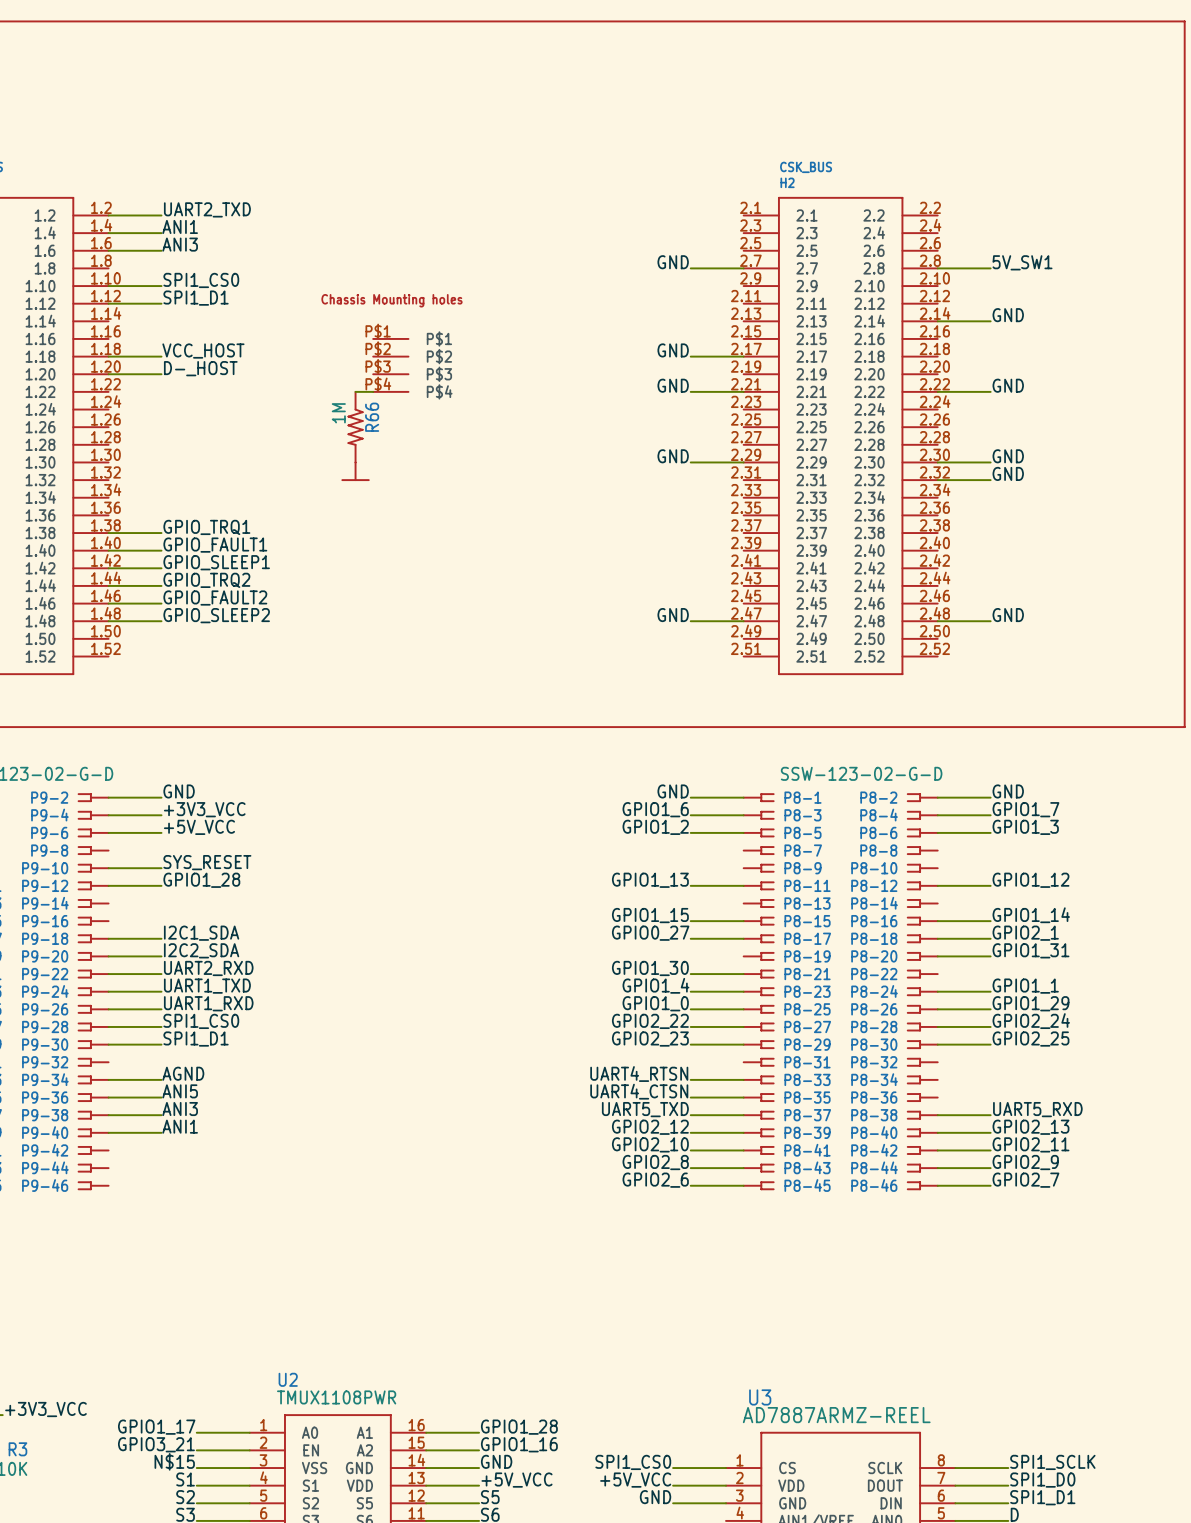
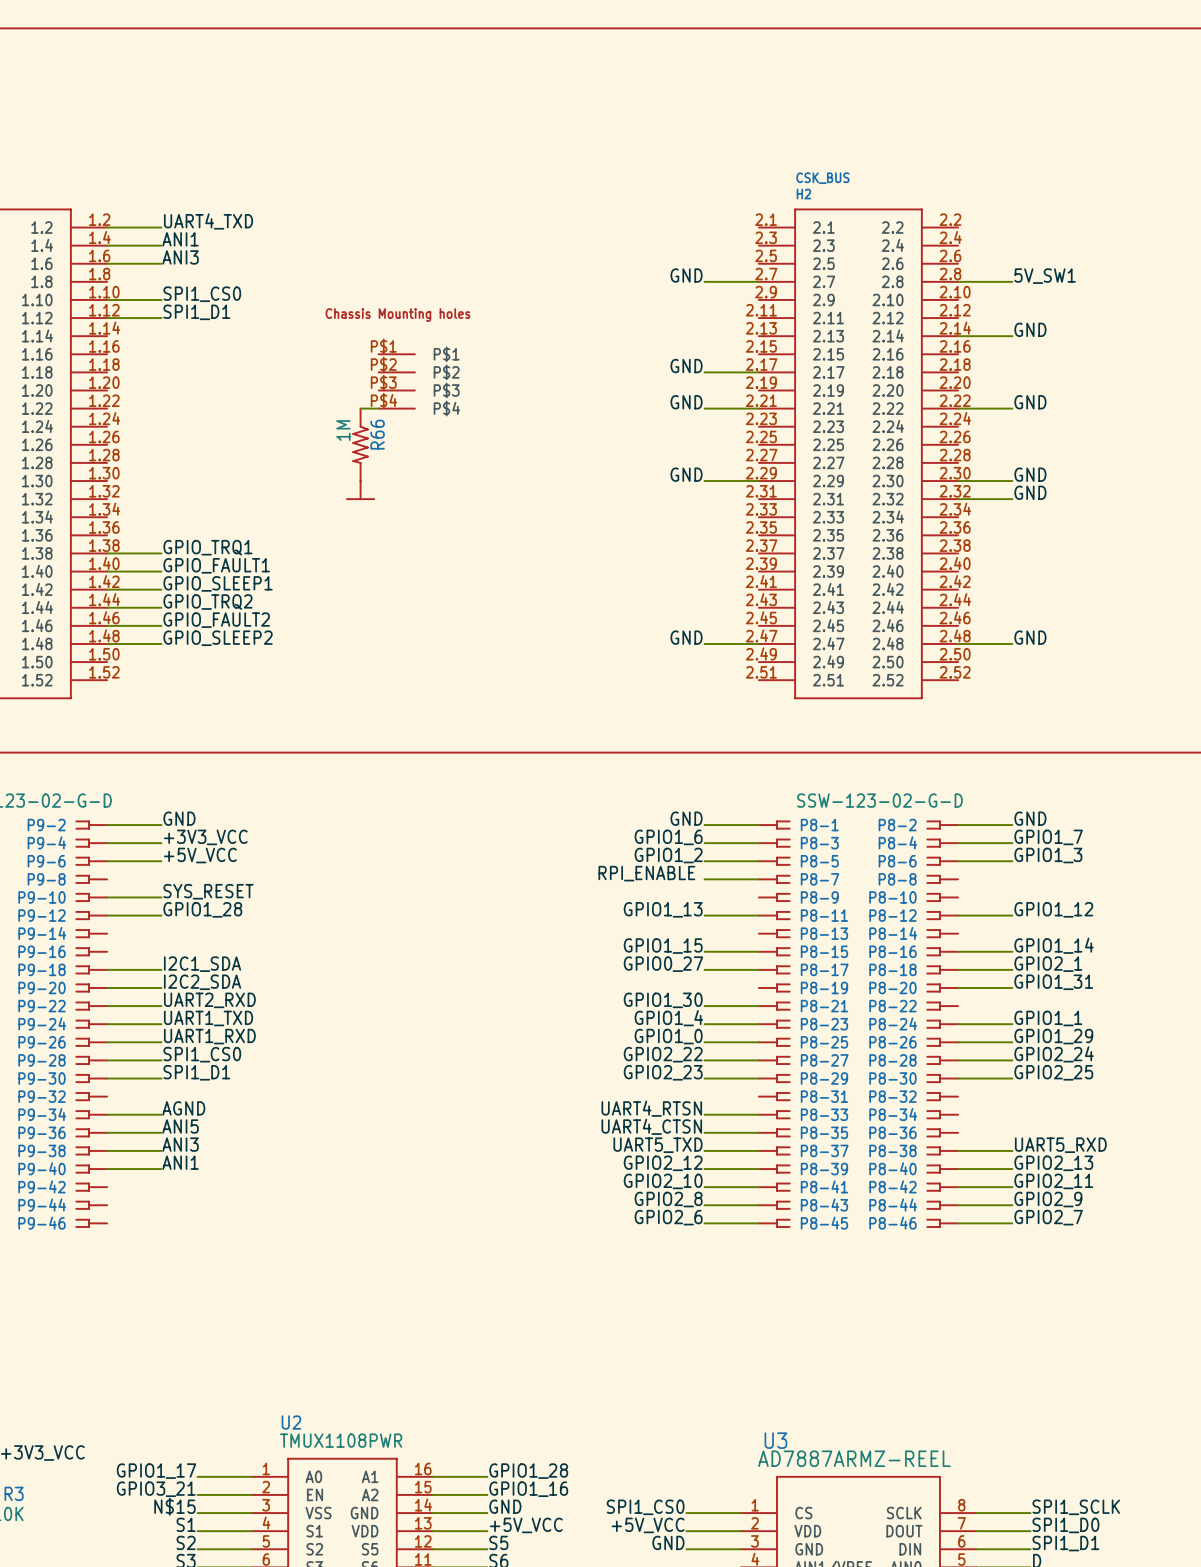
label: UART2_TXD (207, 209) -> UART4_TXD (208, 221)
label: VCC_HOST (203, 351) -> none
wire: (108, 356) (161, 356) -> none
label: D-_HOST (200, 368) -> none
wire: (108, 374) (161, 374) -> none
label: none -> RPI_ENABLE (646, 873)
wire: none -> (704, 879) (758, 879)

